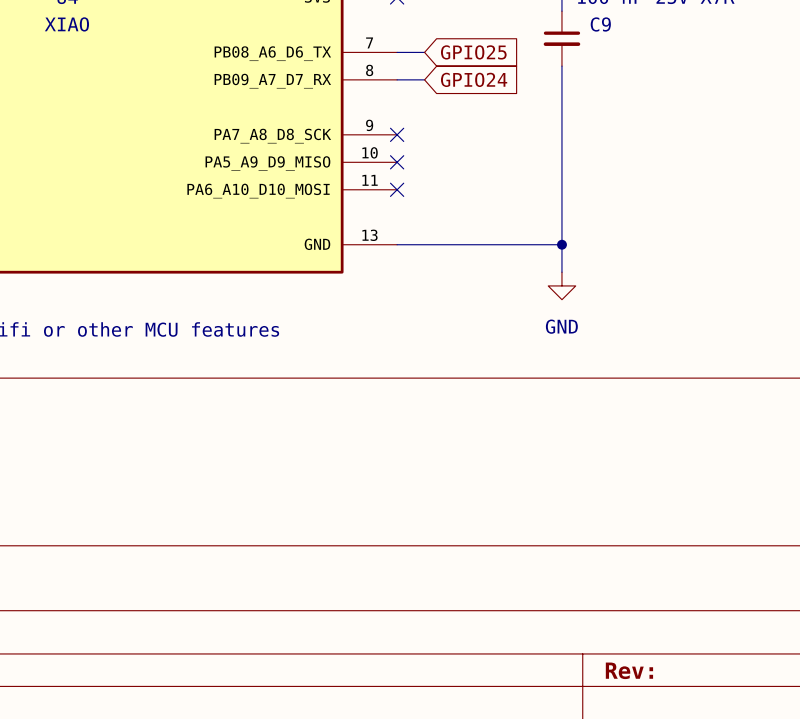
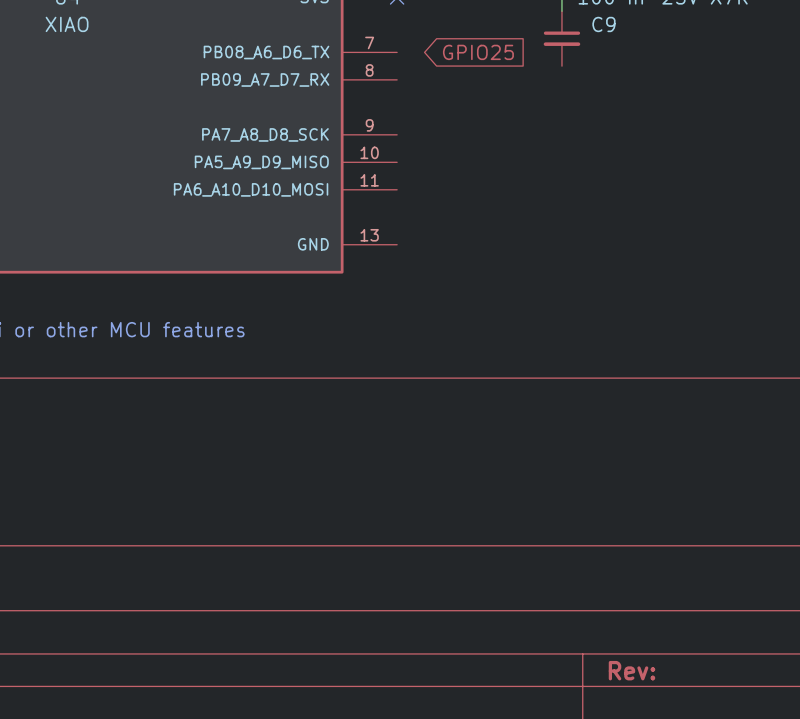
wire: (397, 52) (424, 52) -> none
wire: (561, 66) (561, 272) -> none
wire: (397, 79) (424, 79) -> none
global label: GPIO24 (474, 79) -> none
no-connect mark: (397, 134) -> none
no-connect mark: (397, 162) -> none
no-connect mark: (397, 189) -> none
wire: (397, 244) (561, 244) -> none
junction: (561, 244) -> none
power symbol: GND (561, 285) -> none

